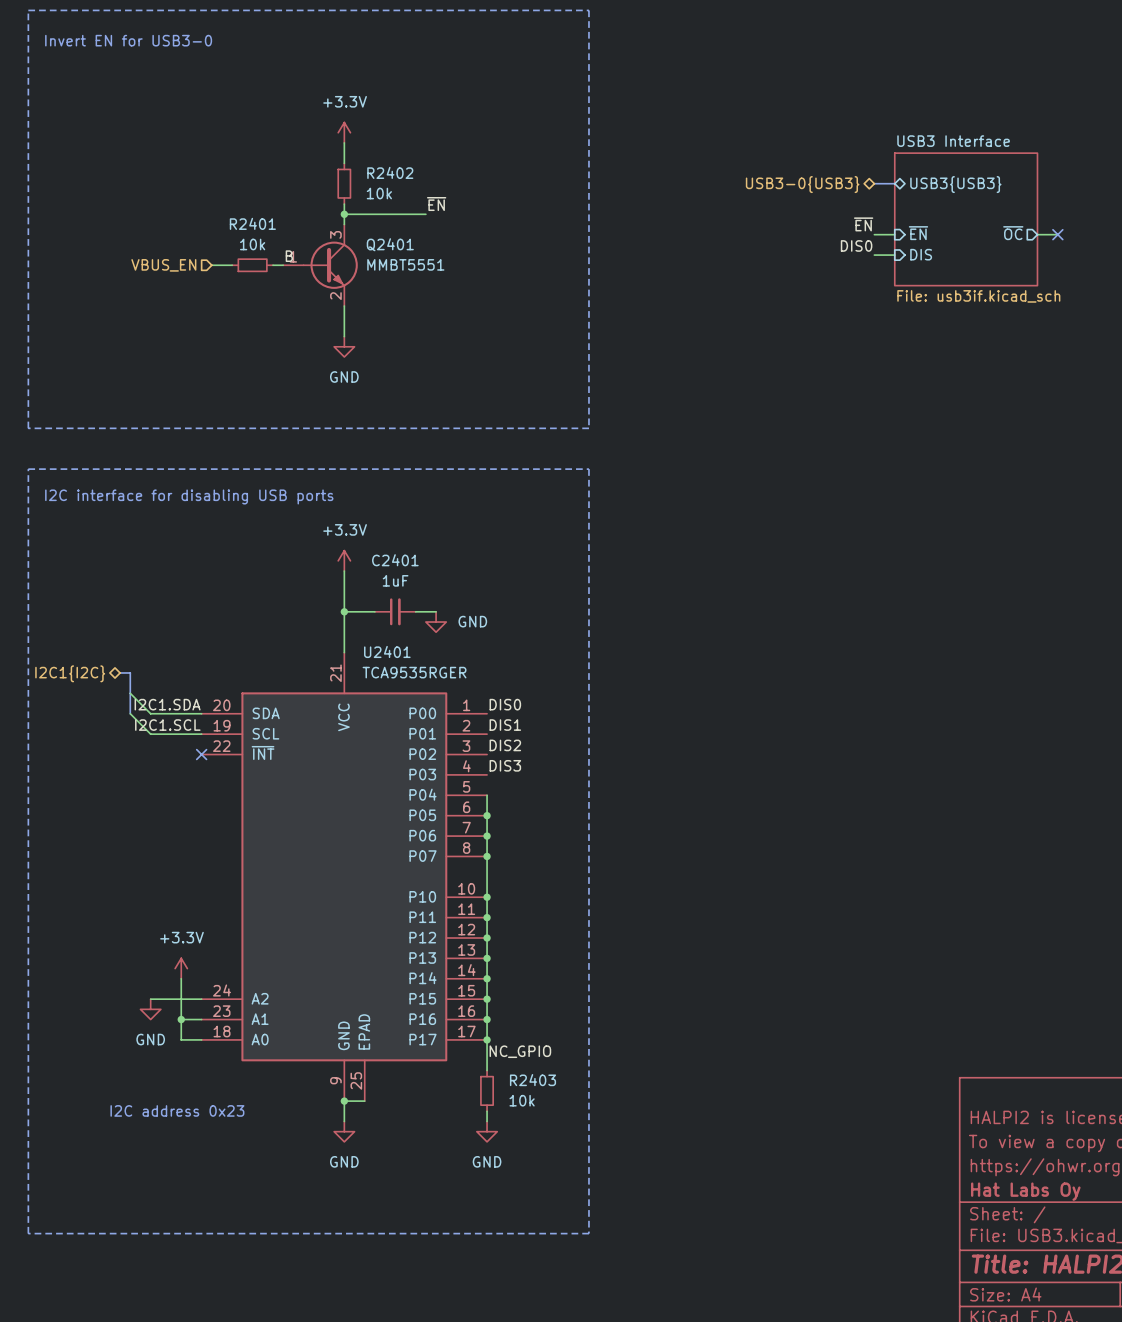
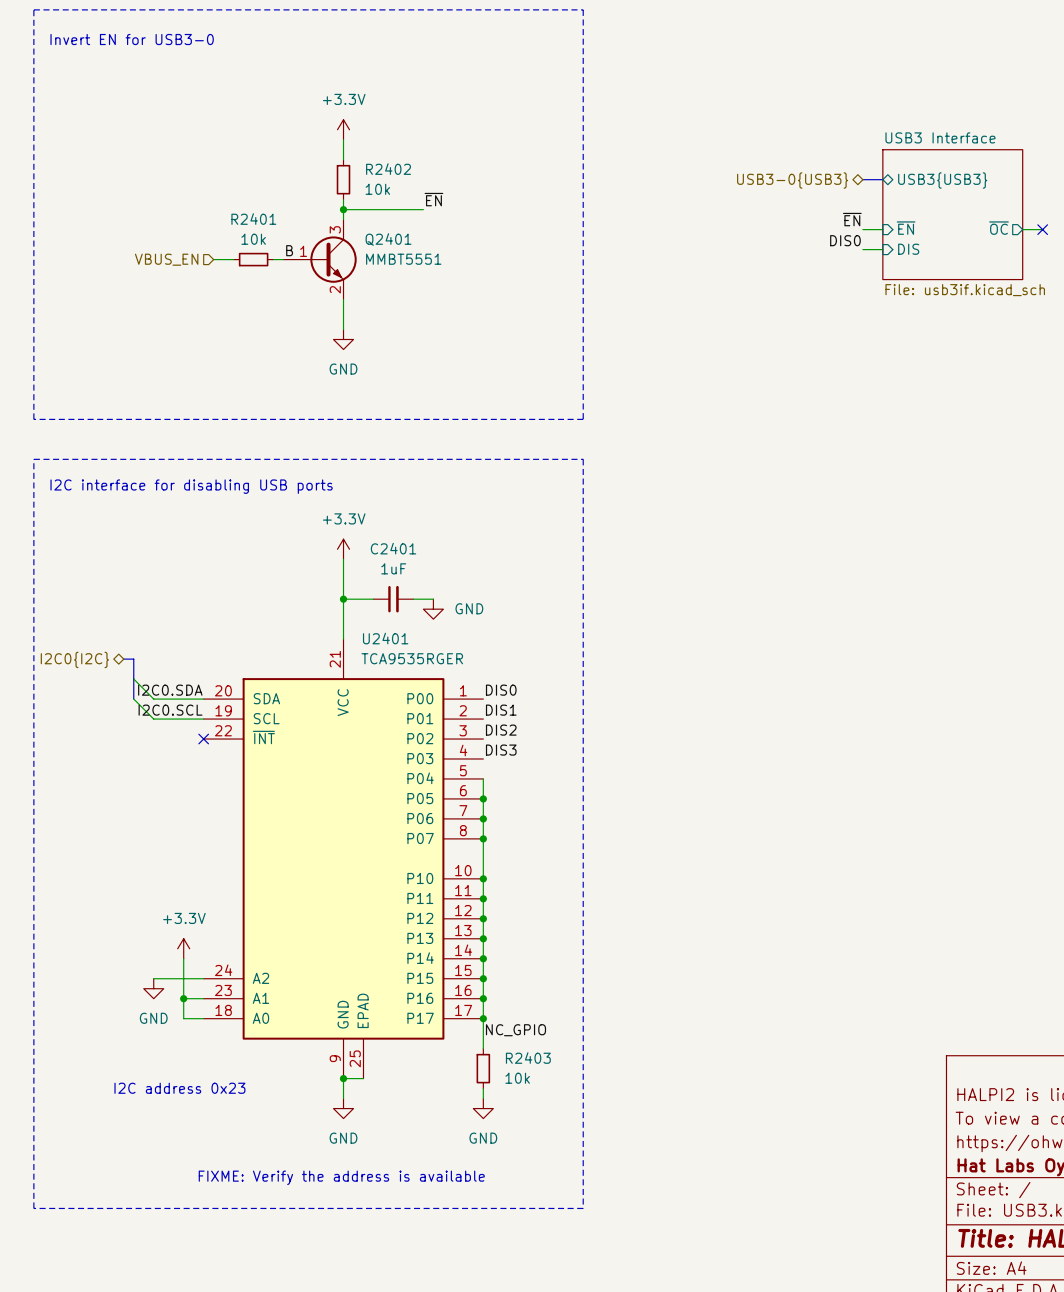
Q2401 symbol: [283, 224, 358, 307] -> [283, 219, 357, 300]
hierarchical label: I2C1{I2C} (70, 673) -> I2C0{I2C} (74, 659)
label: I2C1.SDA (167, 704) -> I2C0.SDA (170, 690)
label: I2C1.SCL (167, 725) -> I2C0.SCL (170, 710)
text: none -> FIXME: Verify the address is available (341, 1177)

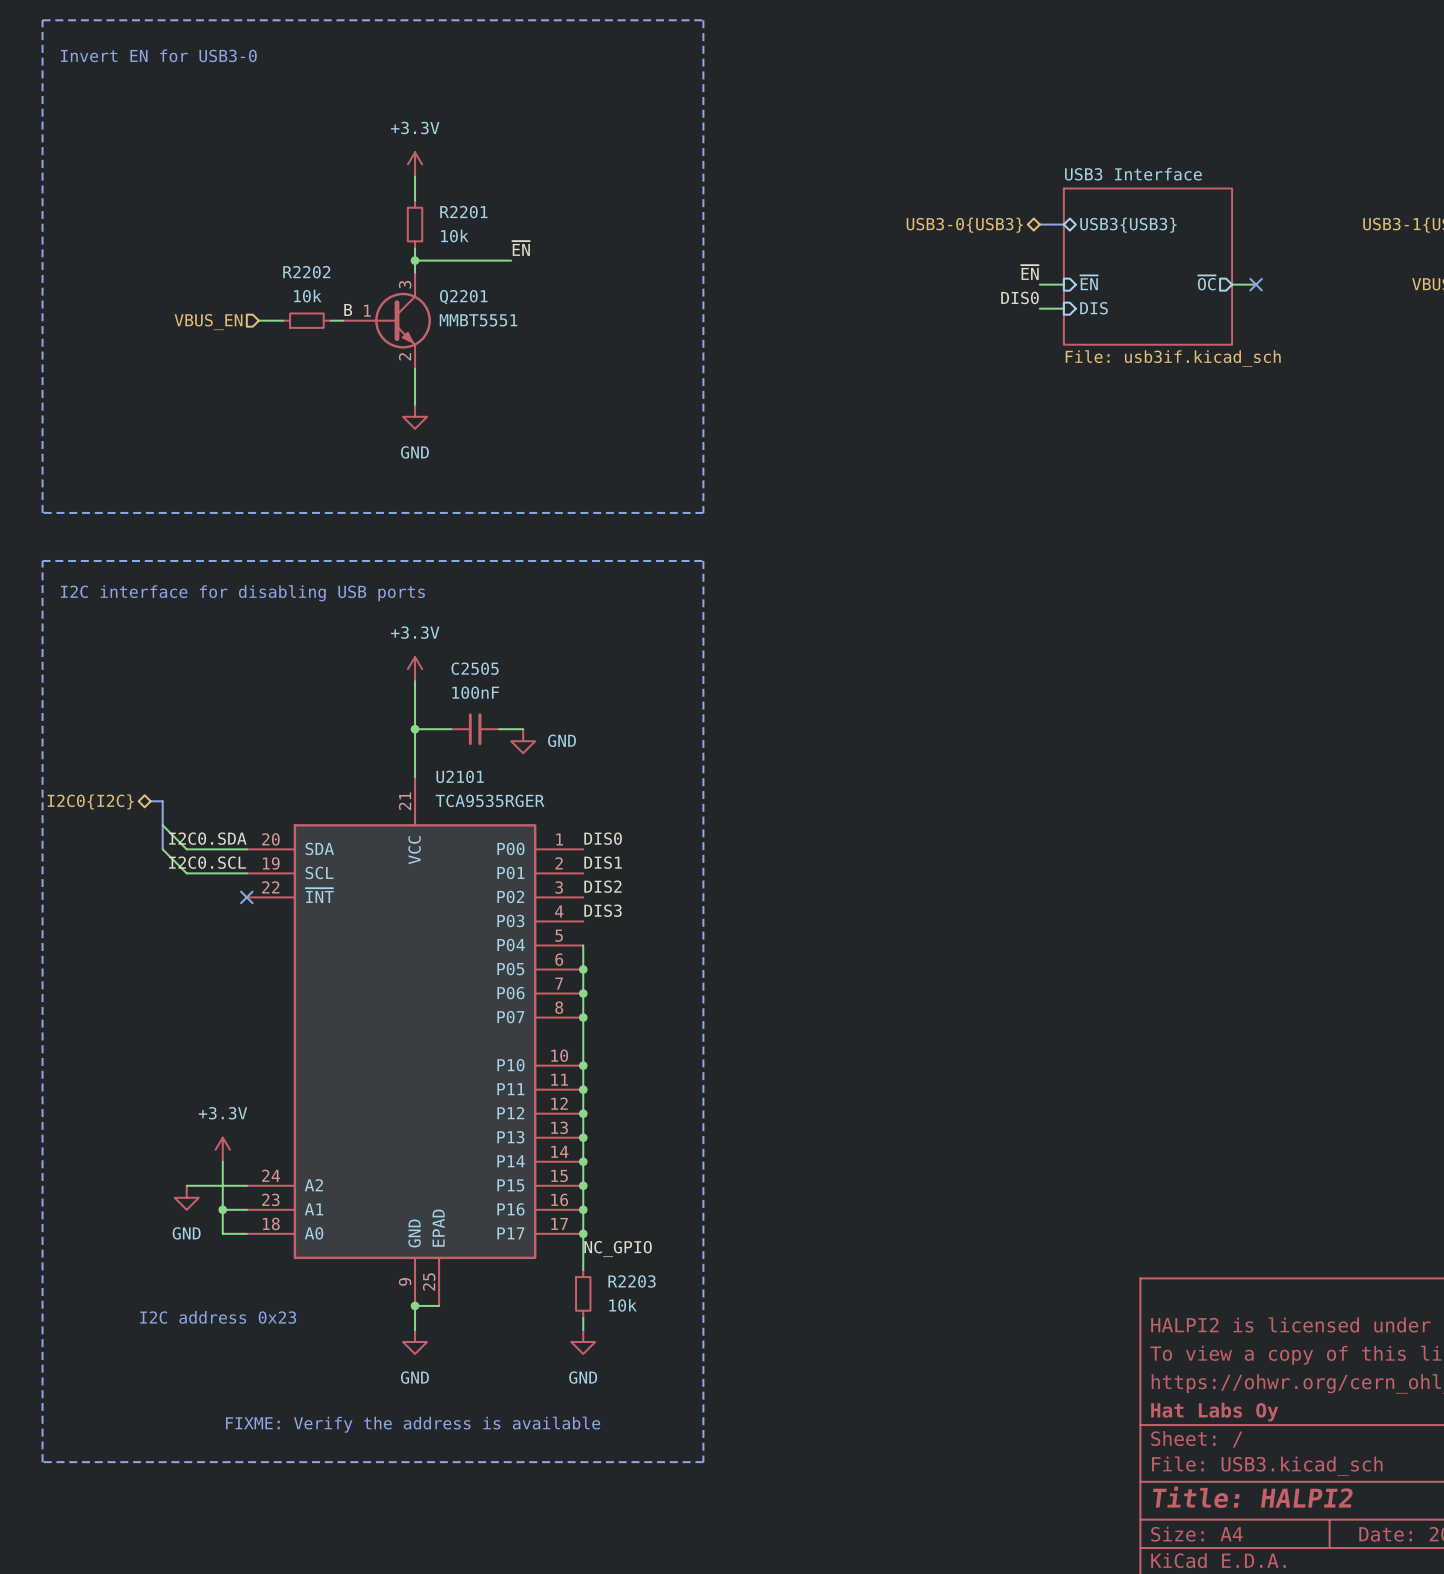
R2402 name: R2402 (388, 169) -> R2201 (463, 212)
R2401 name: R2401 (253, 219) -> R2202 (306, 272)
Q2401 name: Q2401 (388, 239) -> Q2201 (463, 297)
C2401 name: C2401 (393, 548) -> C2505 (475, 668)
C2401 value: 1uF (393, 568) -> 100nF (475, 692)
U2401 name: U2401 (385, 638) -> U2101 (460, 776)
R2403 name: R2403 (528, 1058) -> R2203 (632, 1281)

